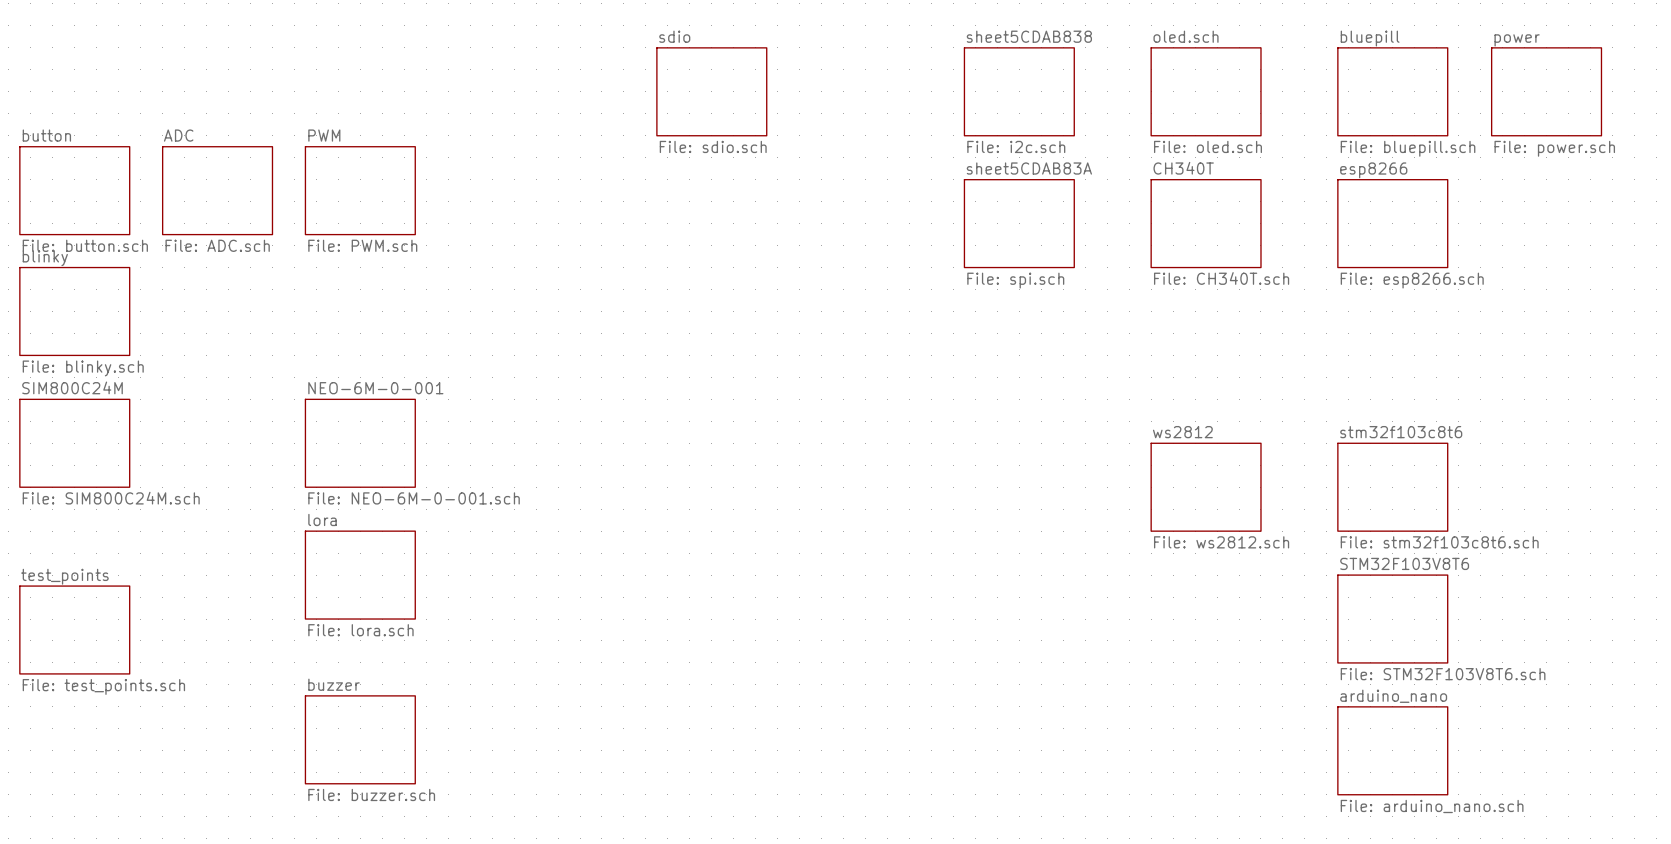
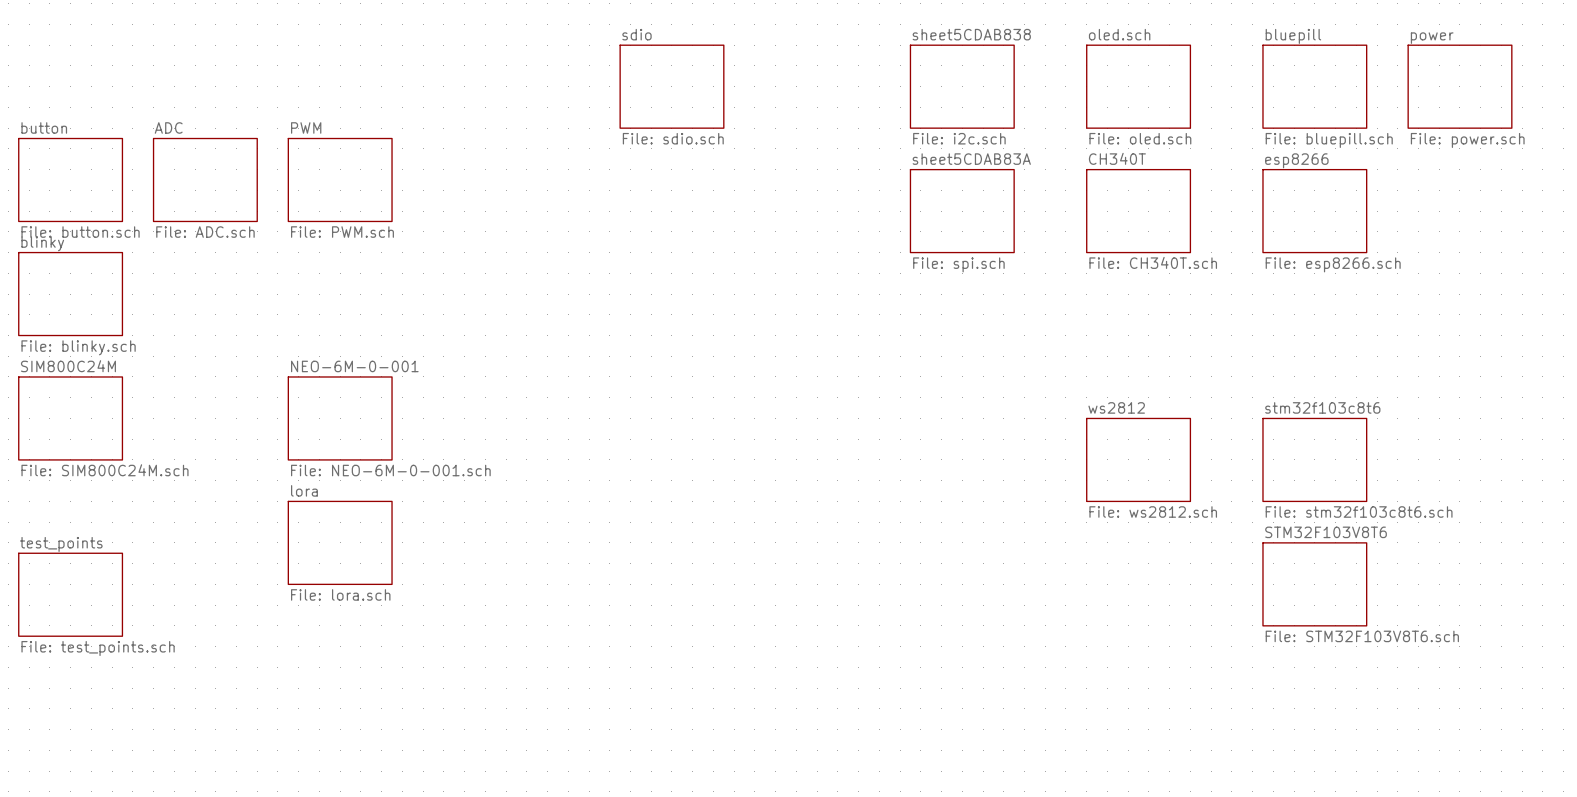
sheet buzzer: File: buzzer.sch (360, 739) -> none
sheet arduino_nano: File: arduino_nano.sch (1392, 750) -> none

